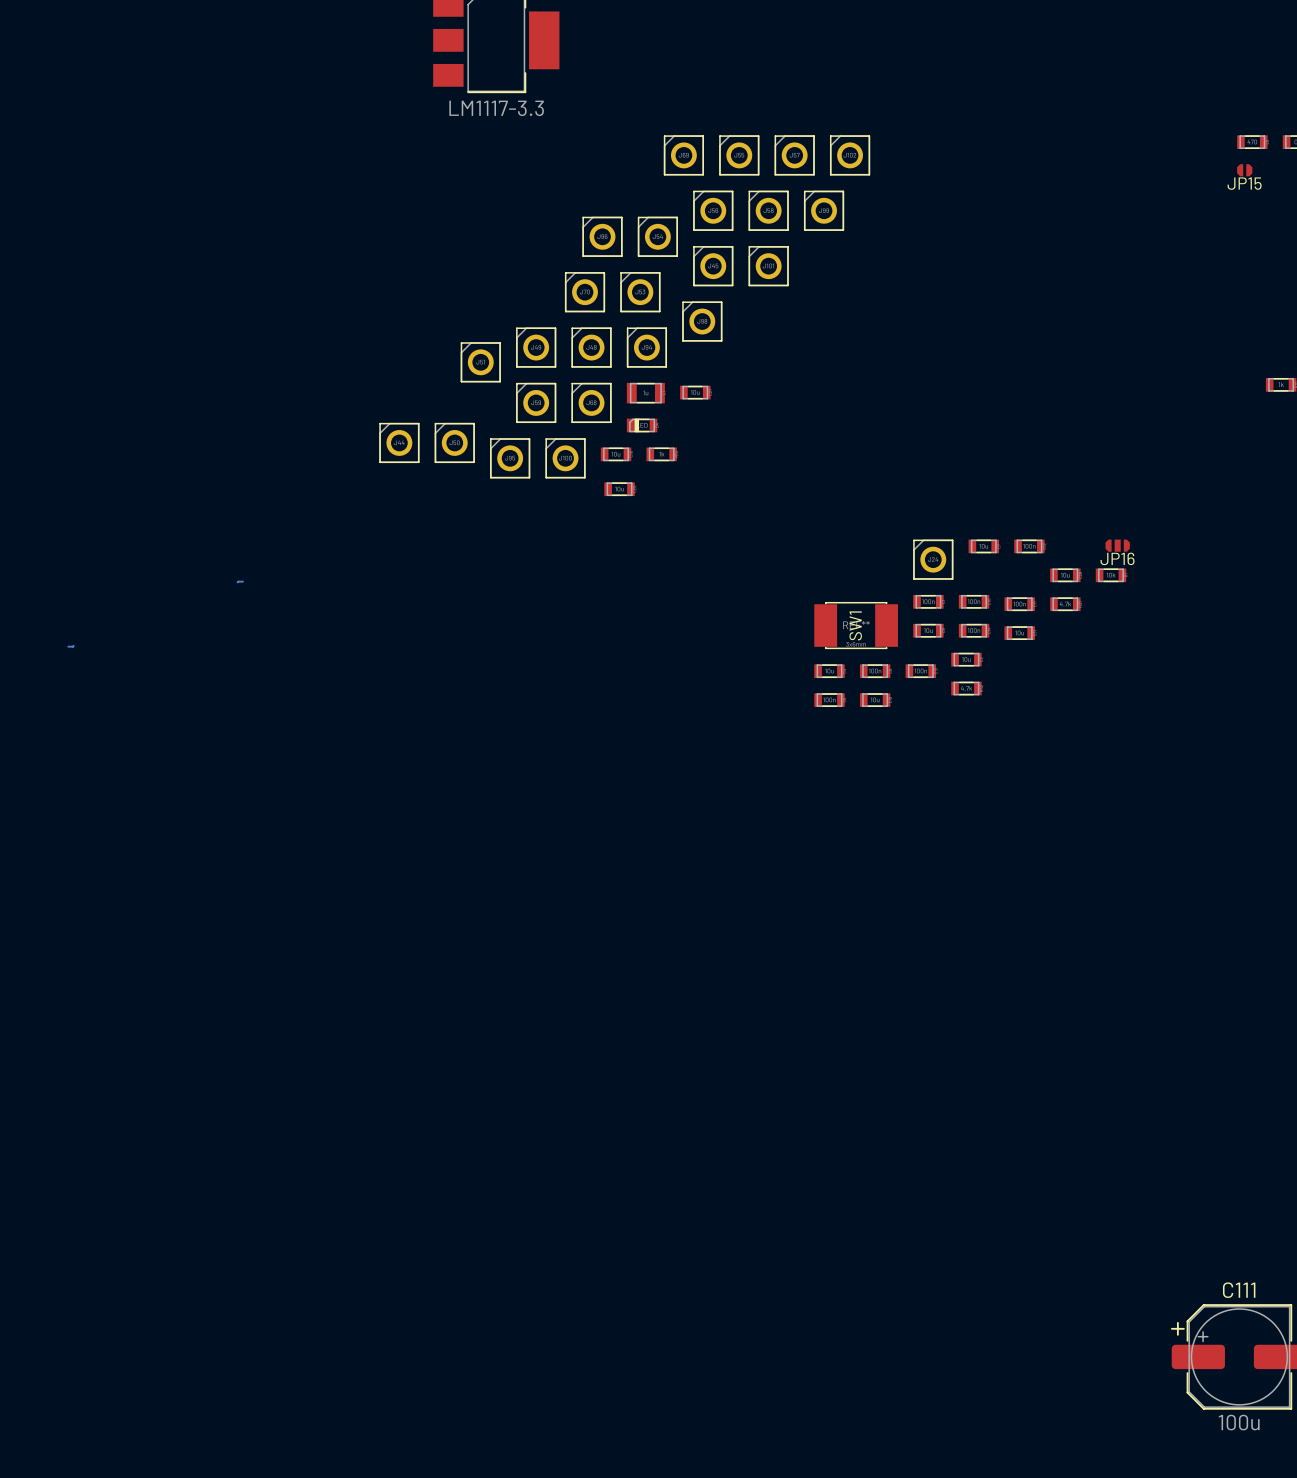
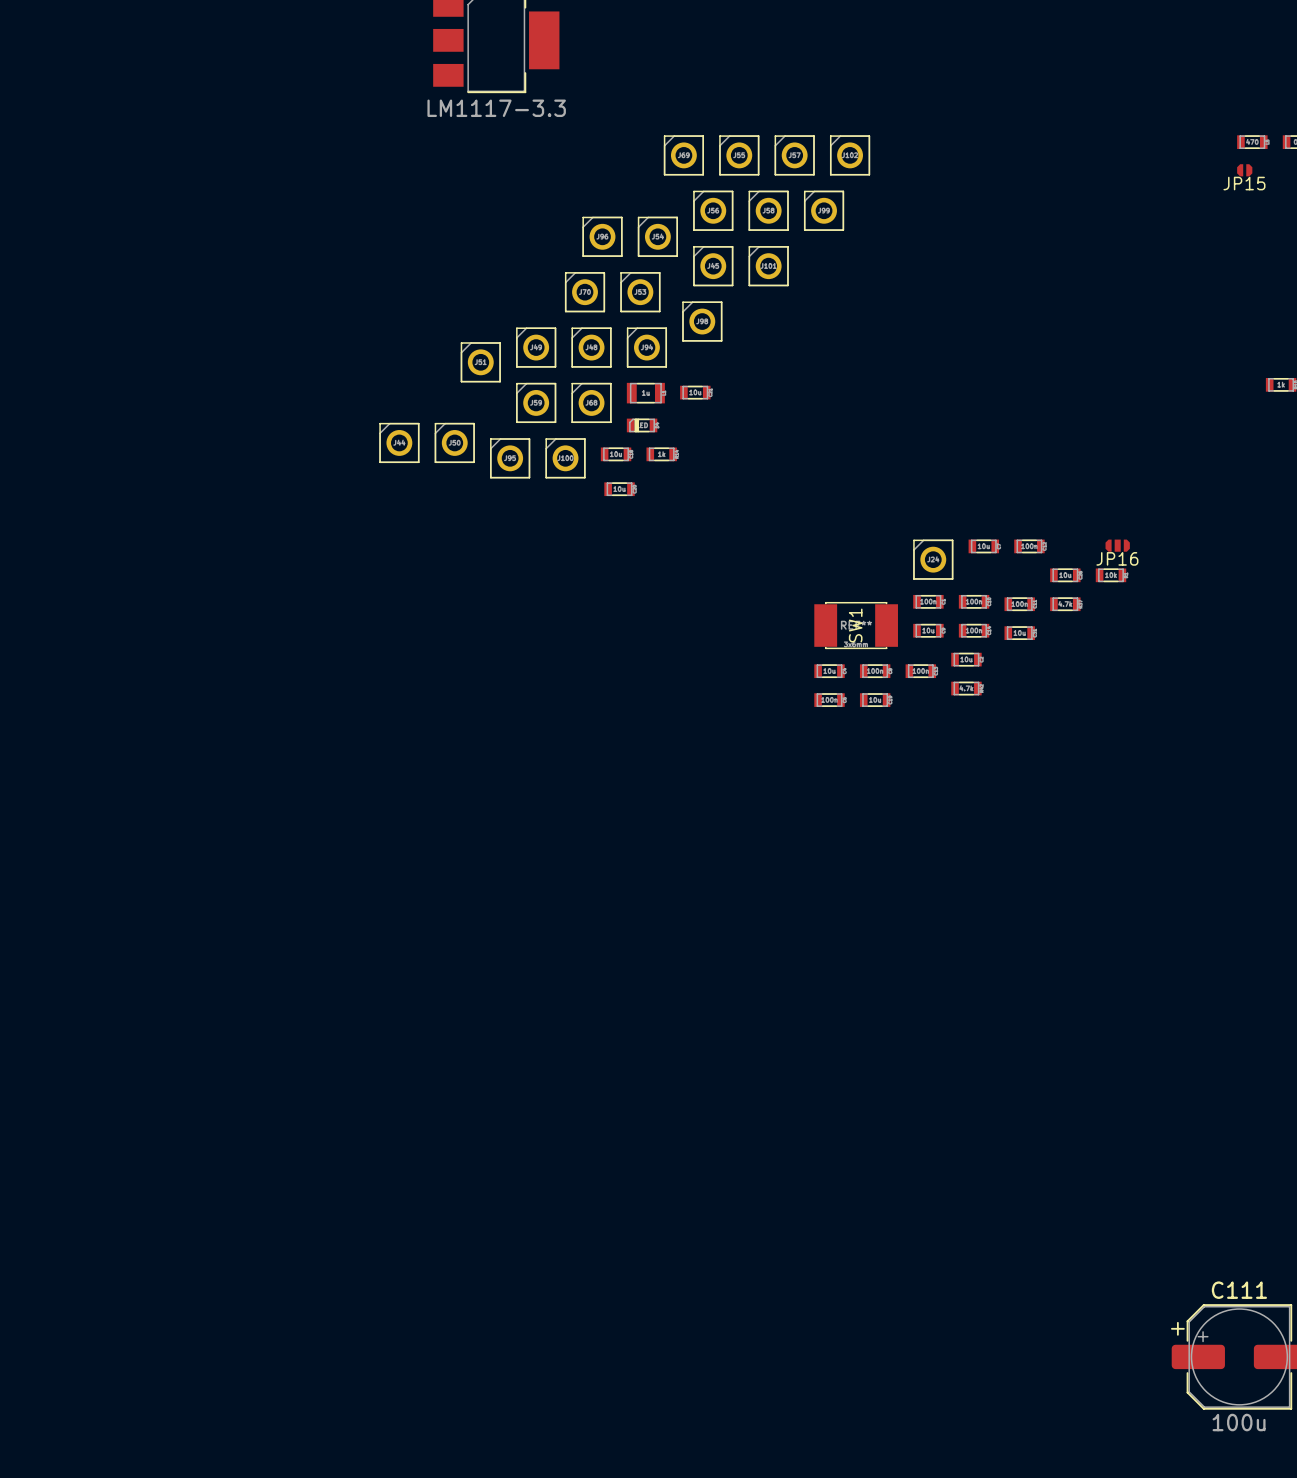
bottom track: (242, 581) (237, 582) -> none
bottom track: (73, 645) (68, 646) -> none

